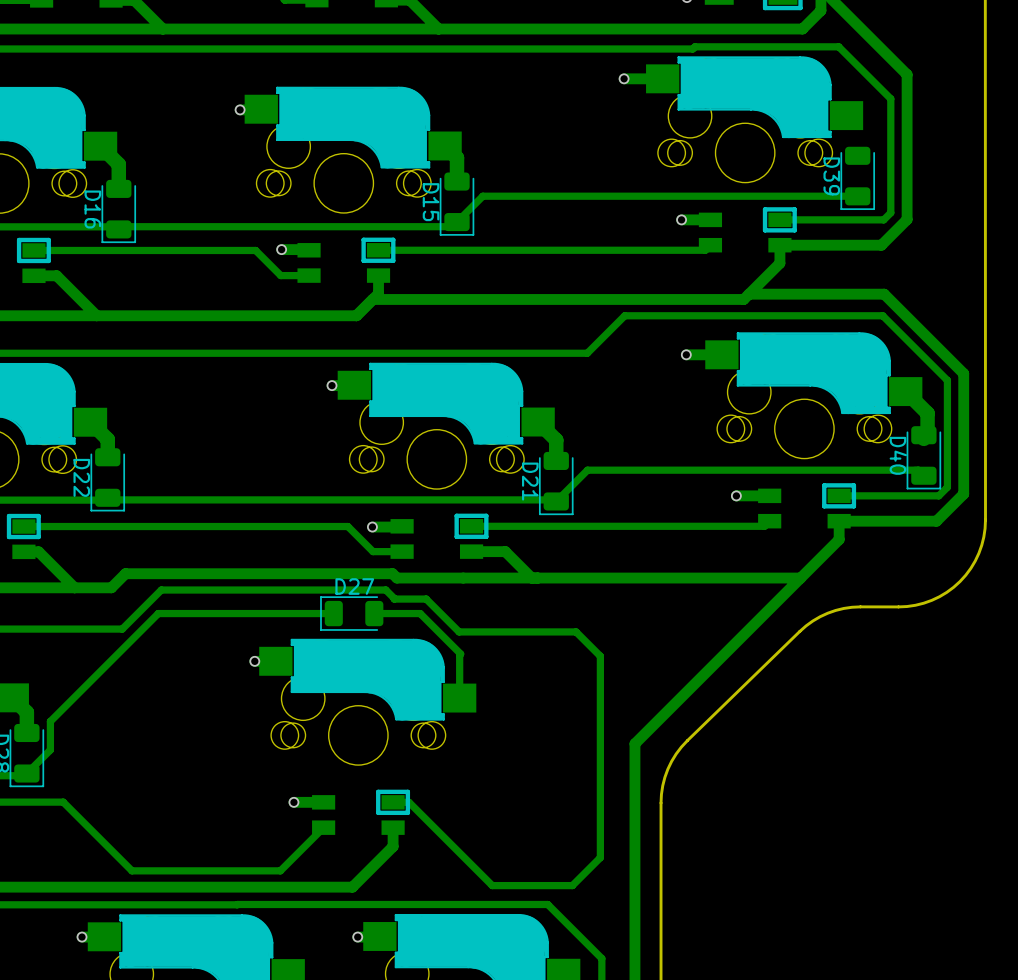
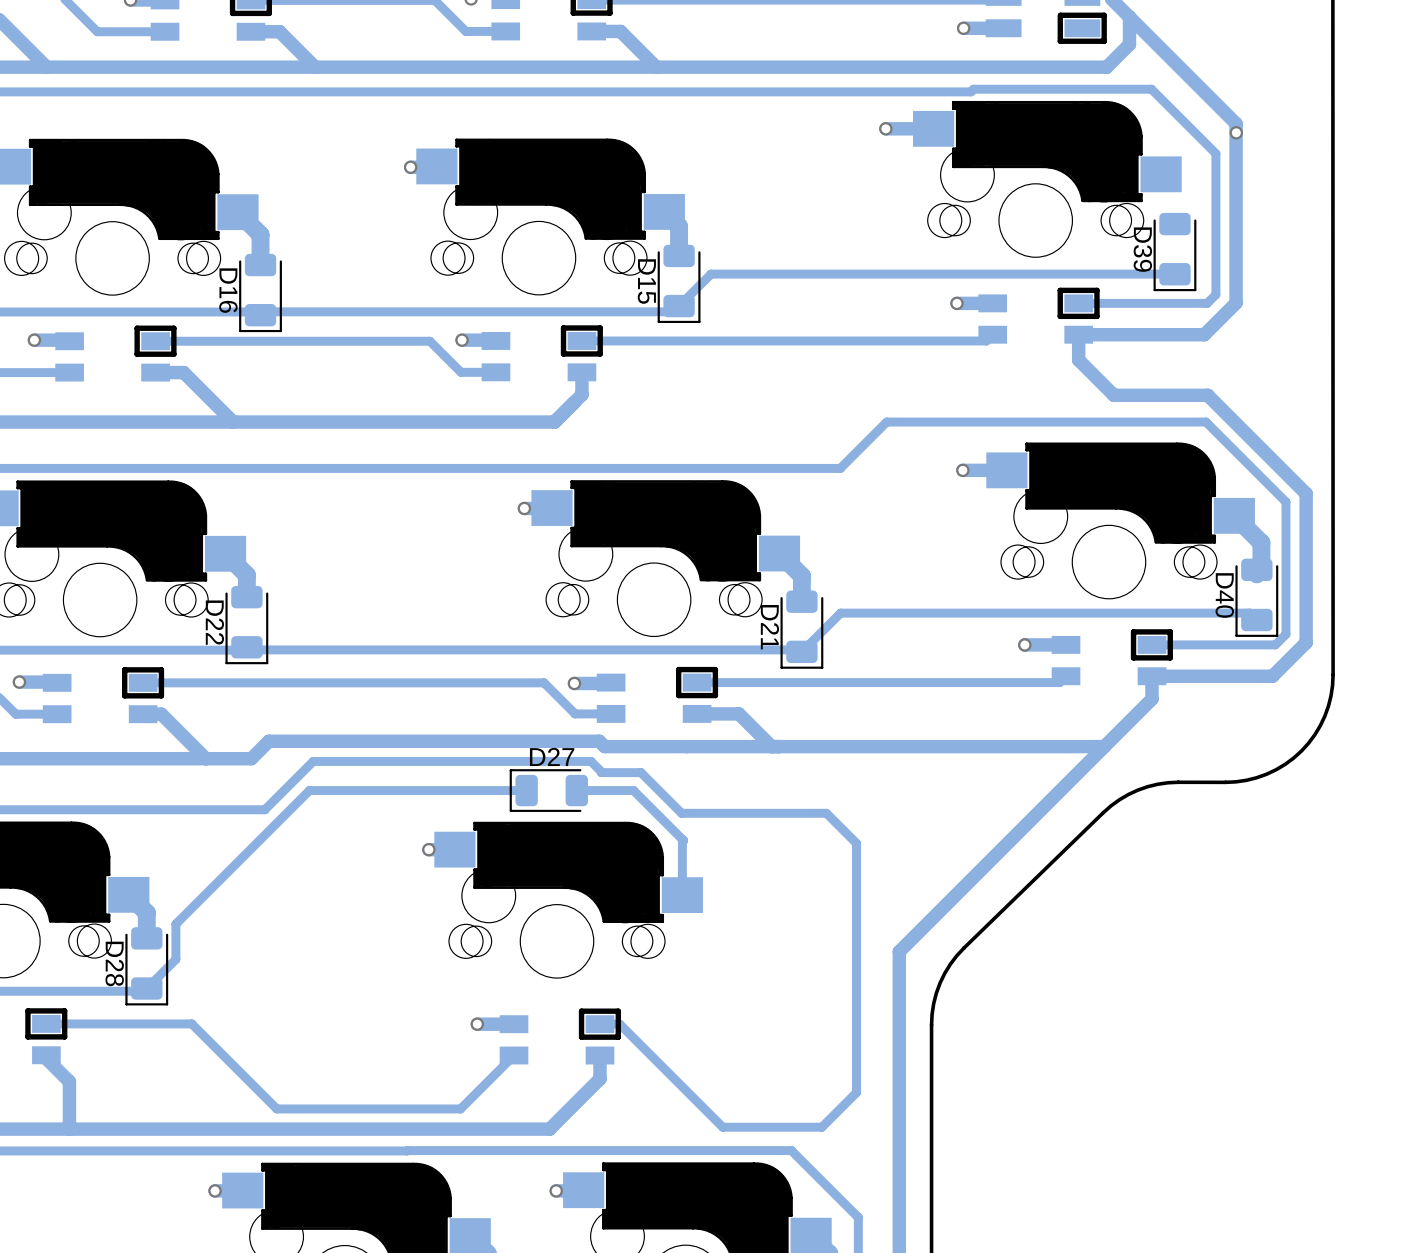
via: none -> (1236, 132)
track: (779, 263) (743, 299) (372, 299) -> none
track: (808, 294) (749, 294) -> (1113, 395) (1078, 360) (1078, 357)

